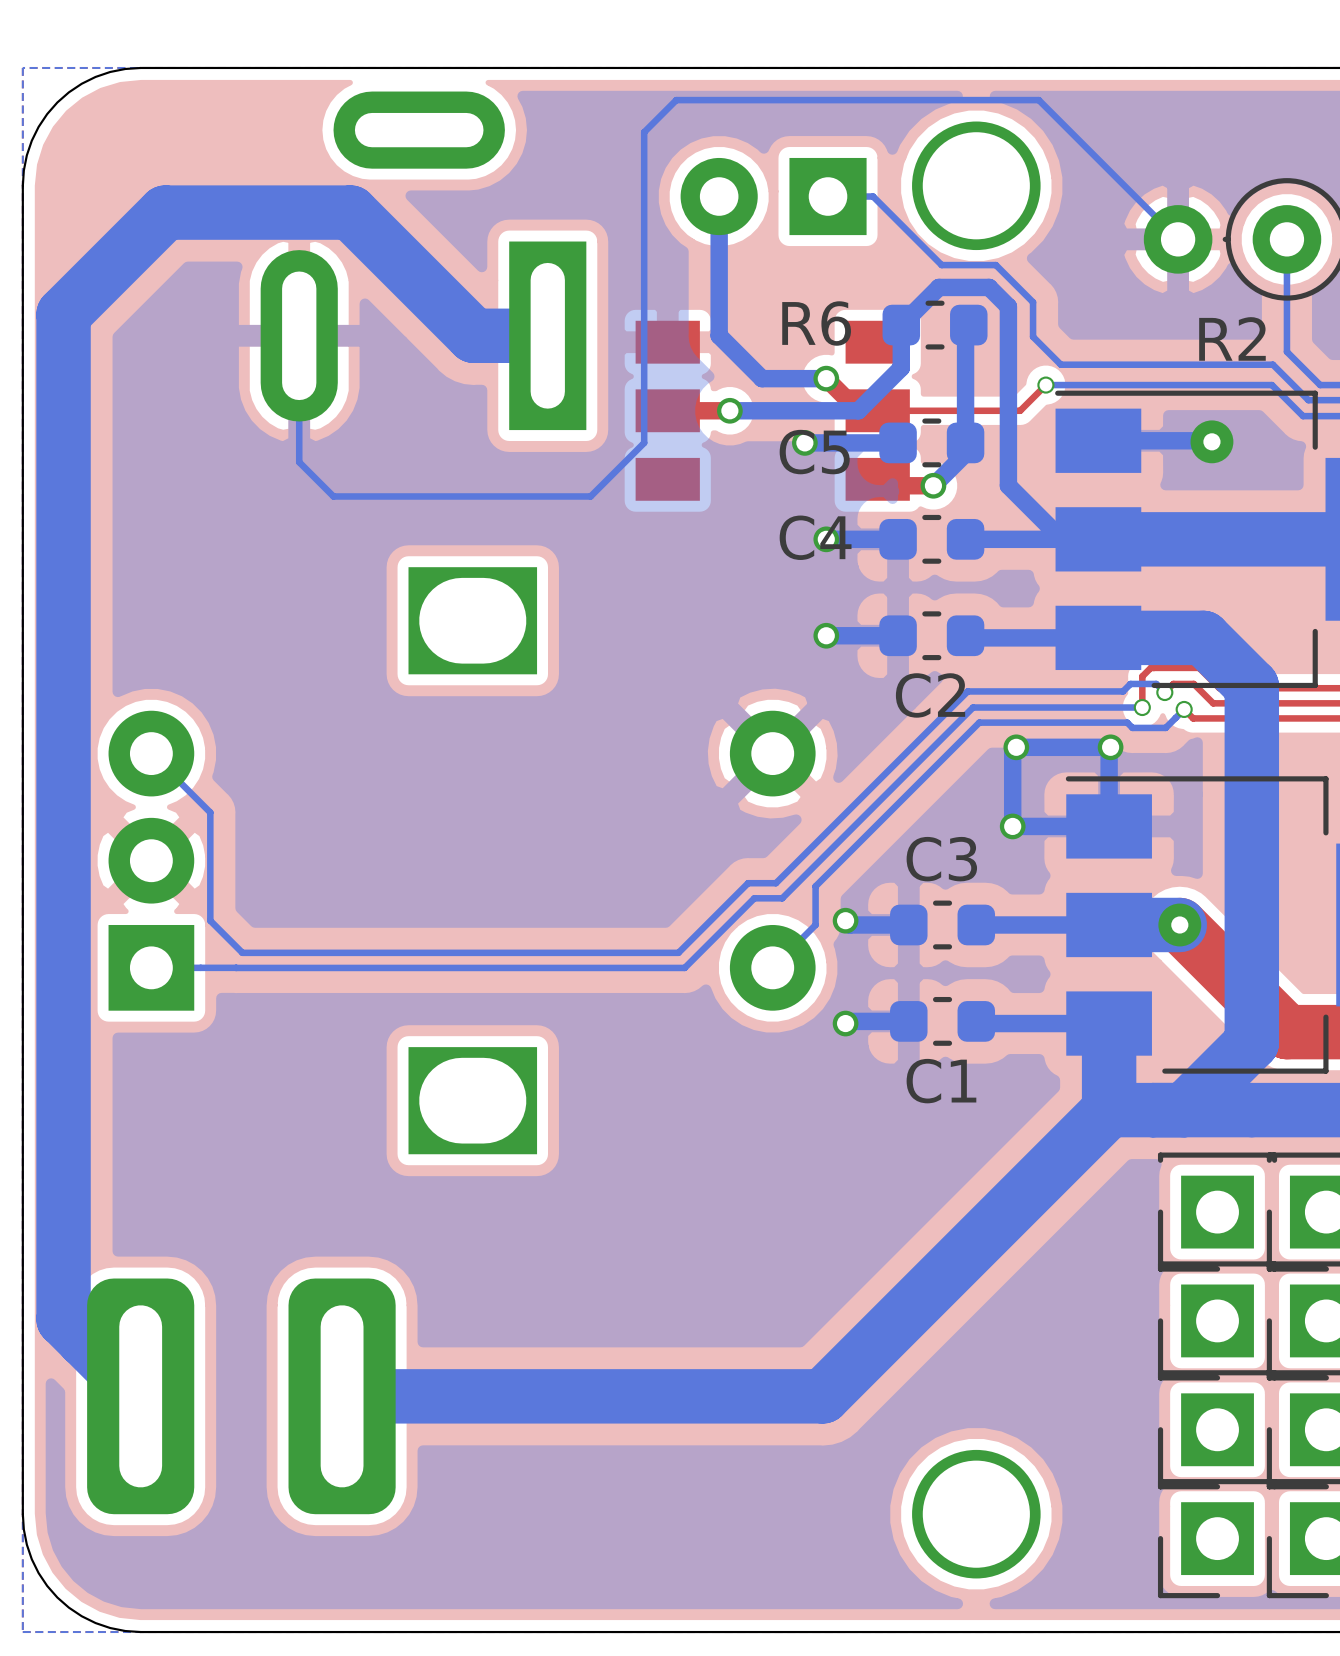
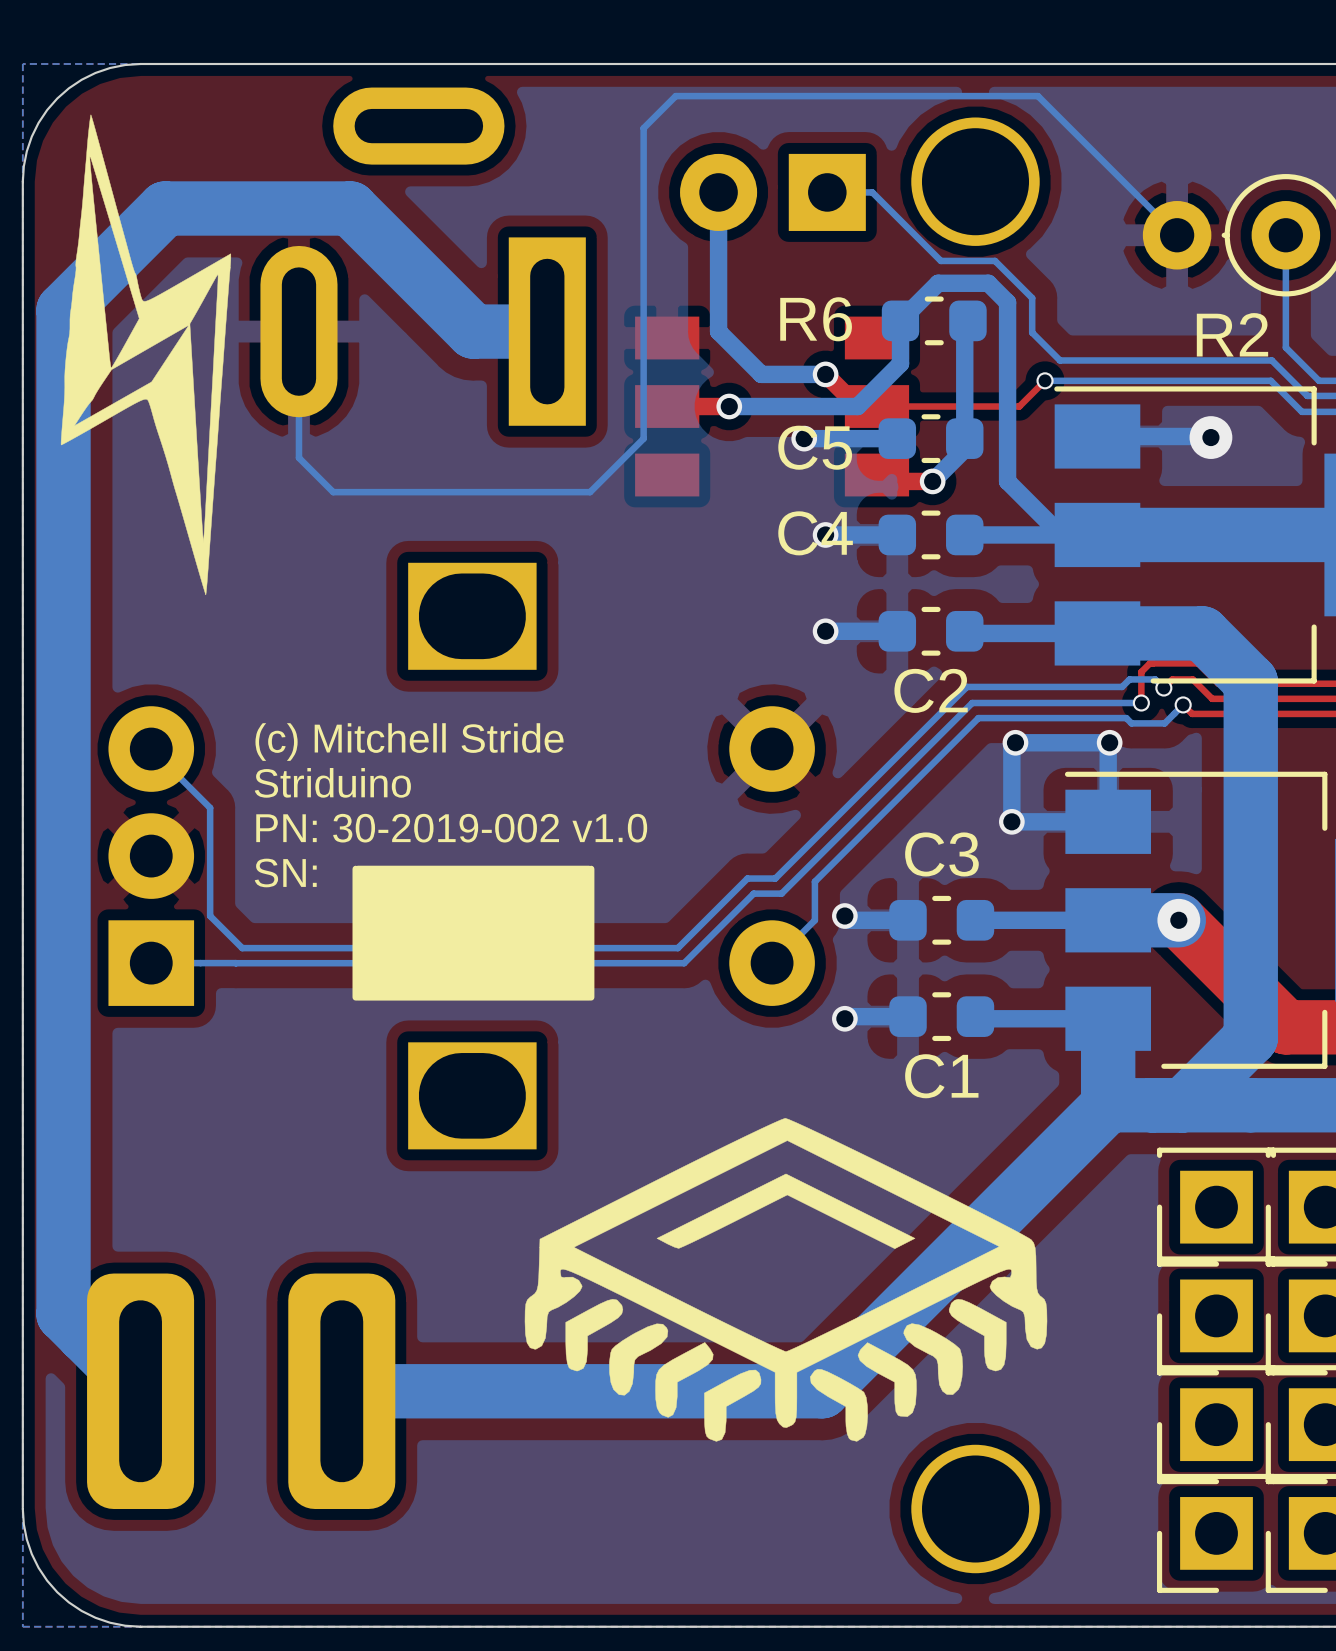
drawing: none -> [60, 114, 232, 596]
text: none -> (c) Mitchell Stride (409, 742)
text: none -> Striduino (332, 782)
text: none -> PN: 30-2019-002 v1.0 (451, 828)
drawing: none -> [352, 865, 595, 1001]
text: none -> SN: (285, 872)
drawing: none -> [524, 1118, 1048, 1442]

